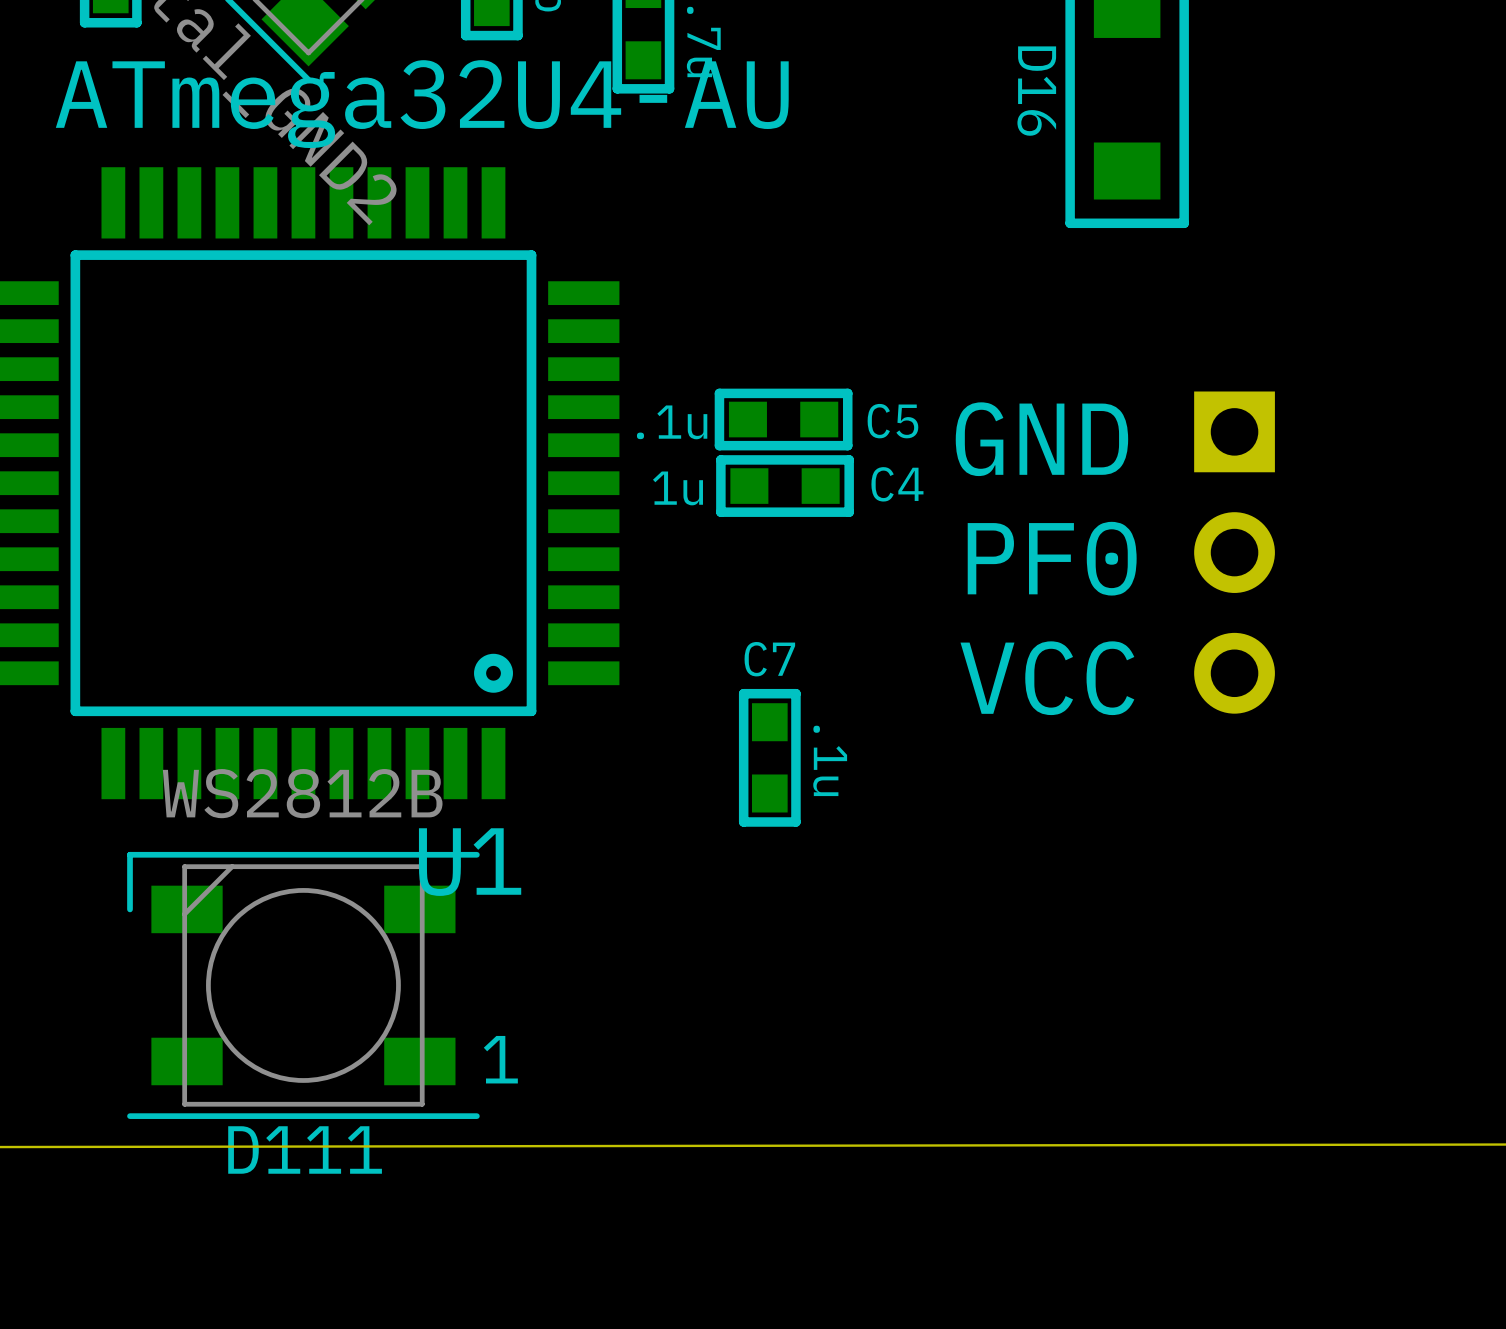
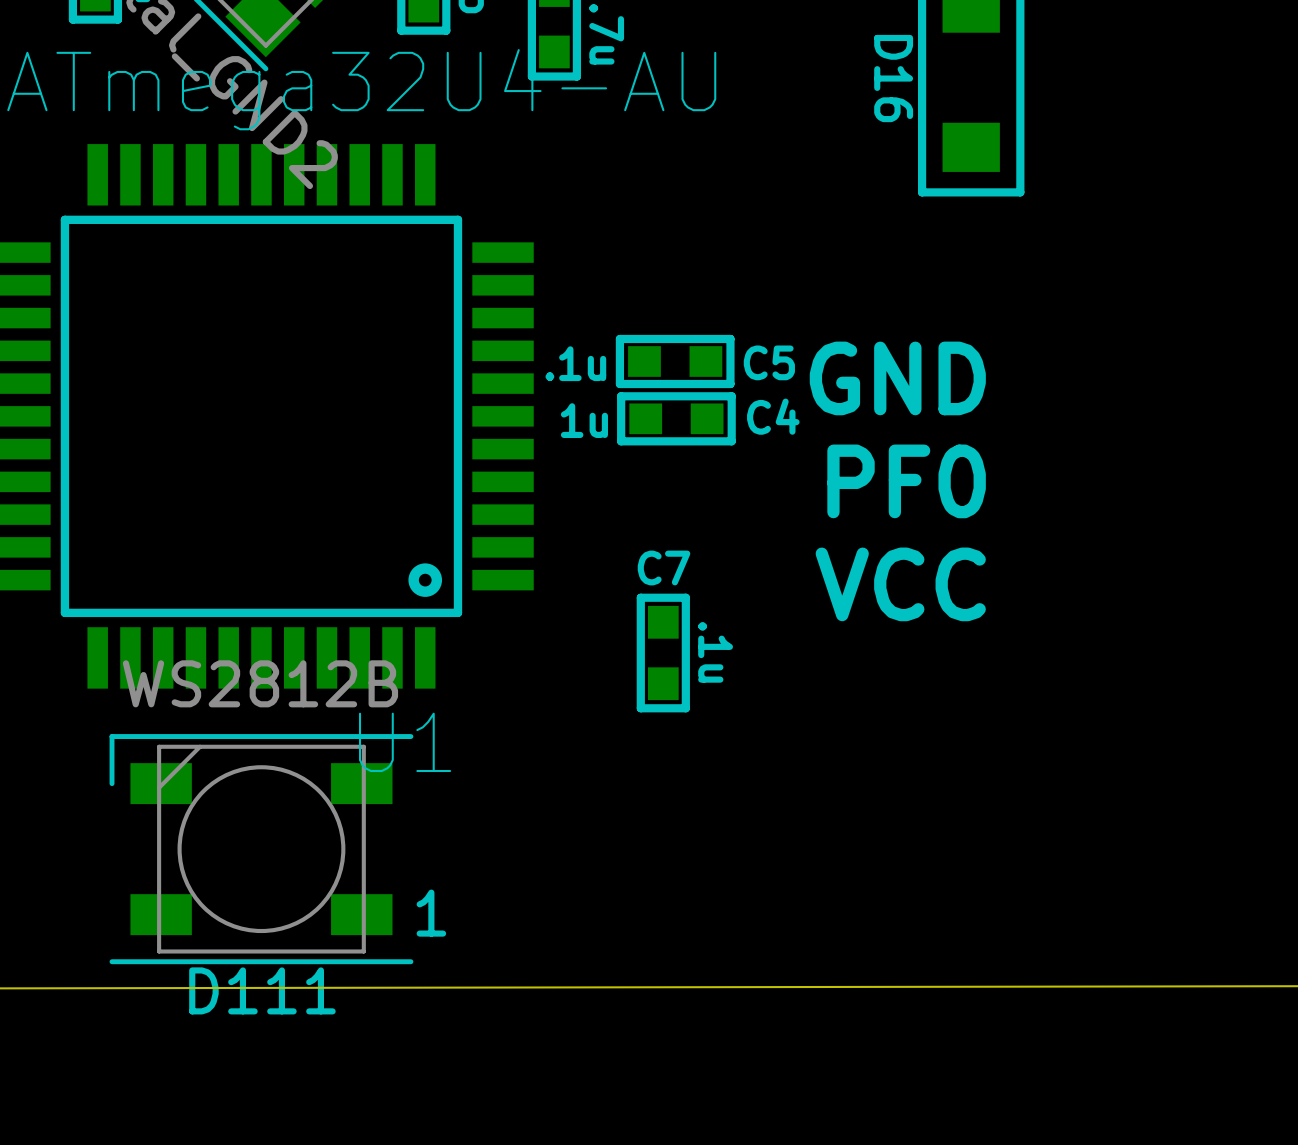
part: (1234, 552) -> none

